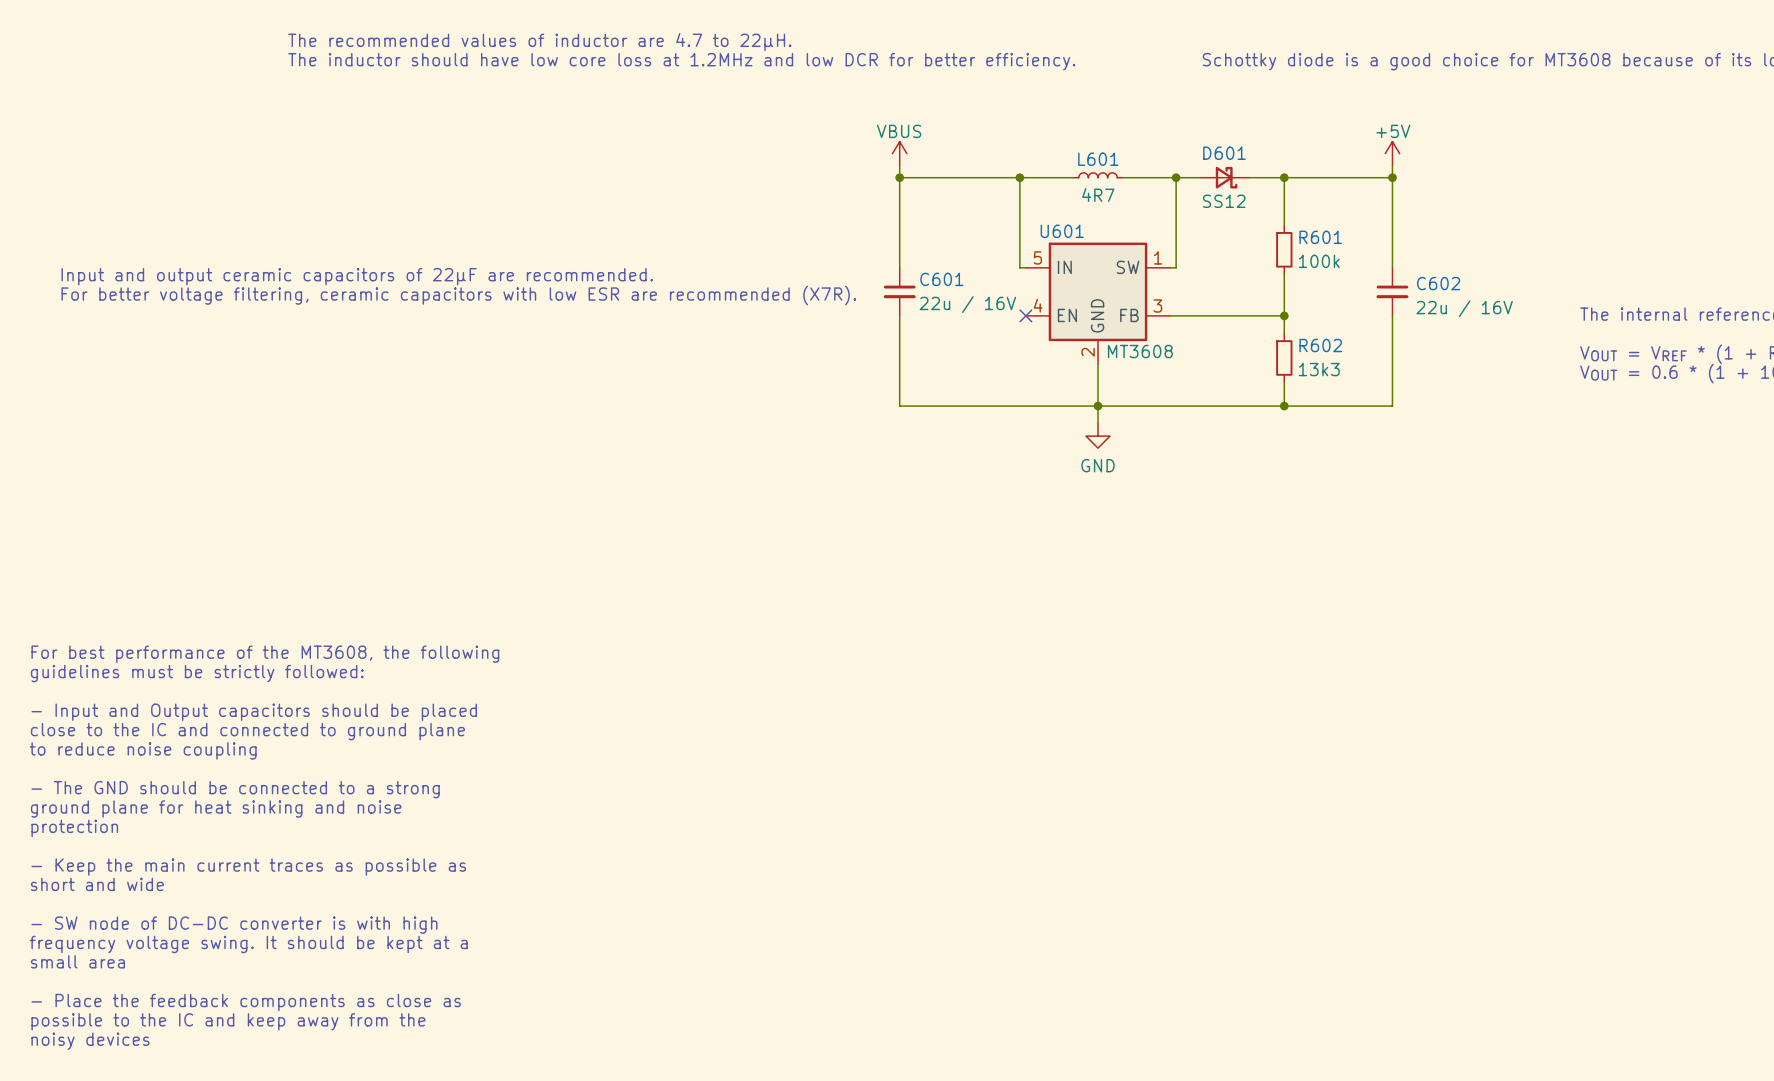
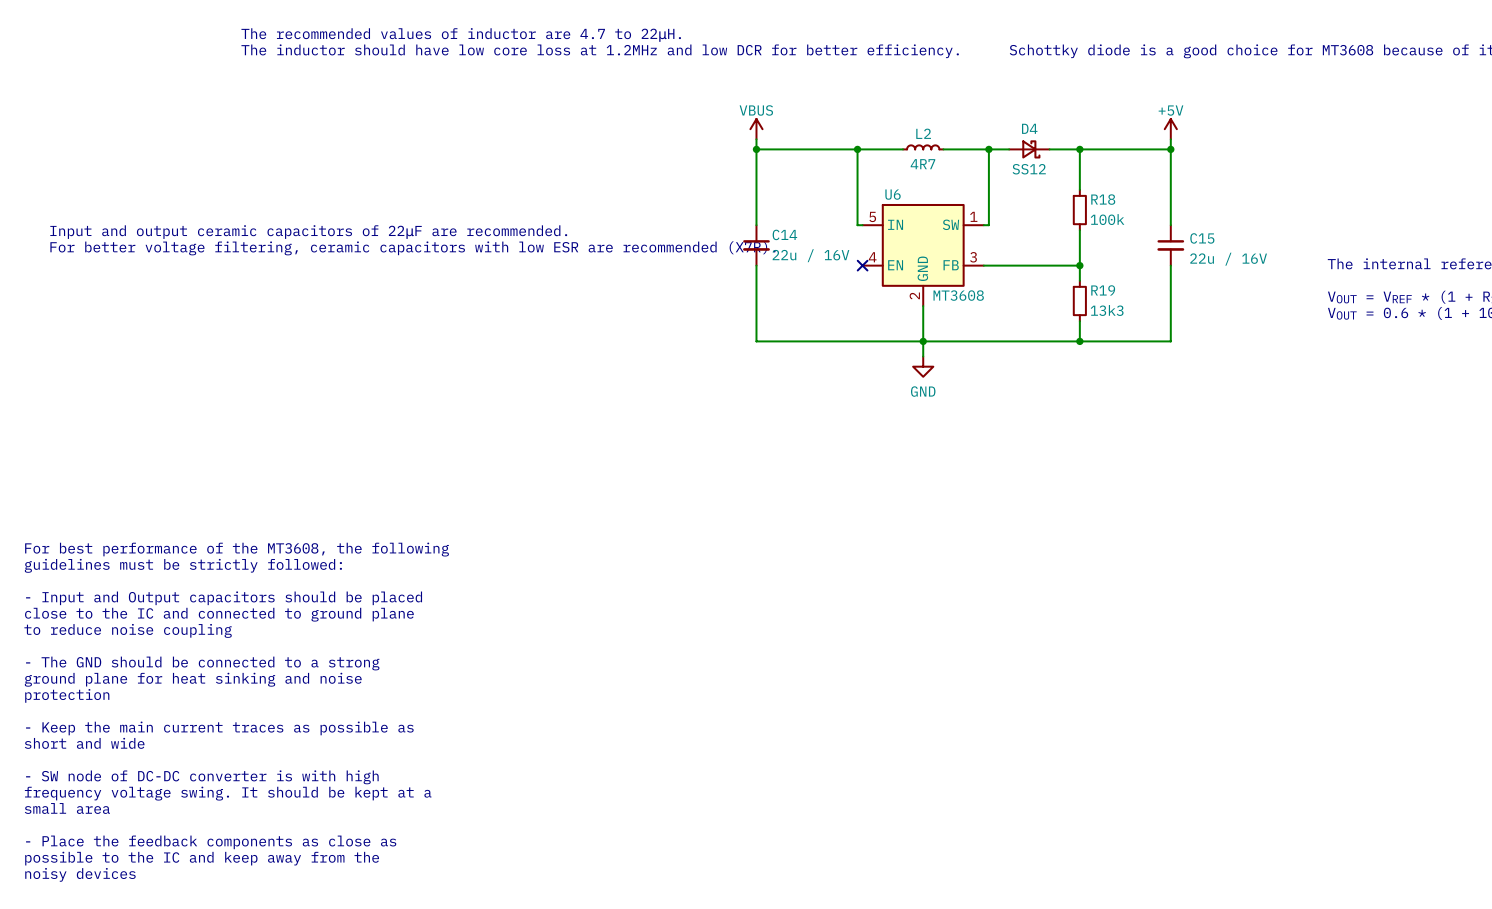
D601 name: D601 (1224, 153) -> D4 (1029, 128)
L601 name: L601 (1098, 159) -> L2 (923, 133)
U601 name: U601 (1062, 231) -> U6 (893, 194)
R601 name: R601 (1320, 237) -> R18 (1103, 199)
C601 name: C601 (941, 279) -> C14 (784, 234)
C602 name: C602 (1438, 283) -> C15 (1202, 238)
R602 name: R602 (1320, 345) -> R19 (1103, 290)

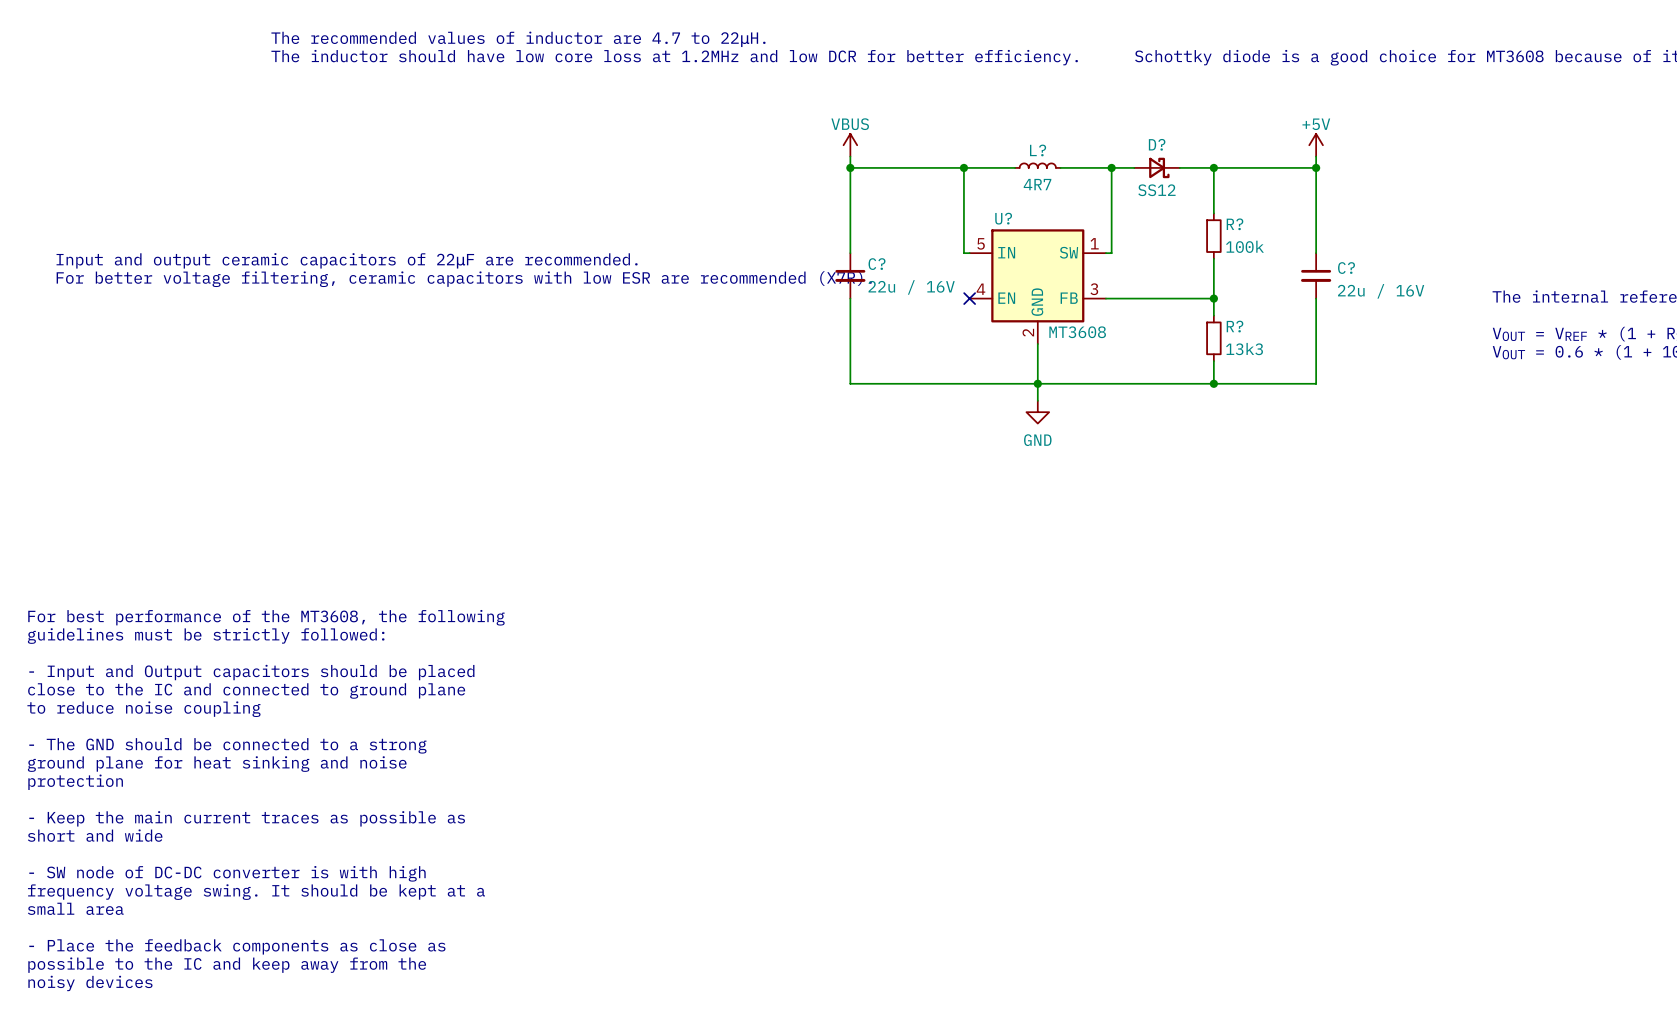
D4 name: D4 (1029, 128) -> D? (1157, 144)
L2 name: L2 (923, 133) -> L? (1038, 150)
U6 name: U6 (893, 194) -> U? (1003, 218)
R18 name: R18 (1103, 199) -> R? (1235, 224)
C14 name: C14 (784, 234) -> C? (877, 264)
C15 name: C15 (1202, 238) -> C? (1346, 268)
R19 name: R19 (1103, 290) -> R? (1235, 326)

